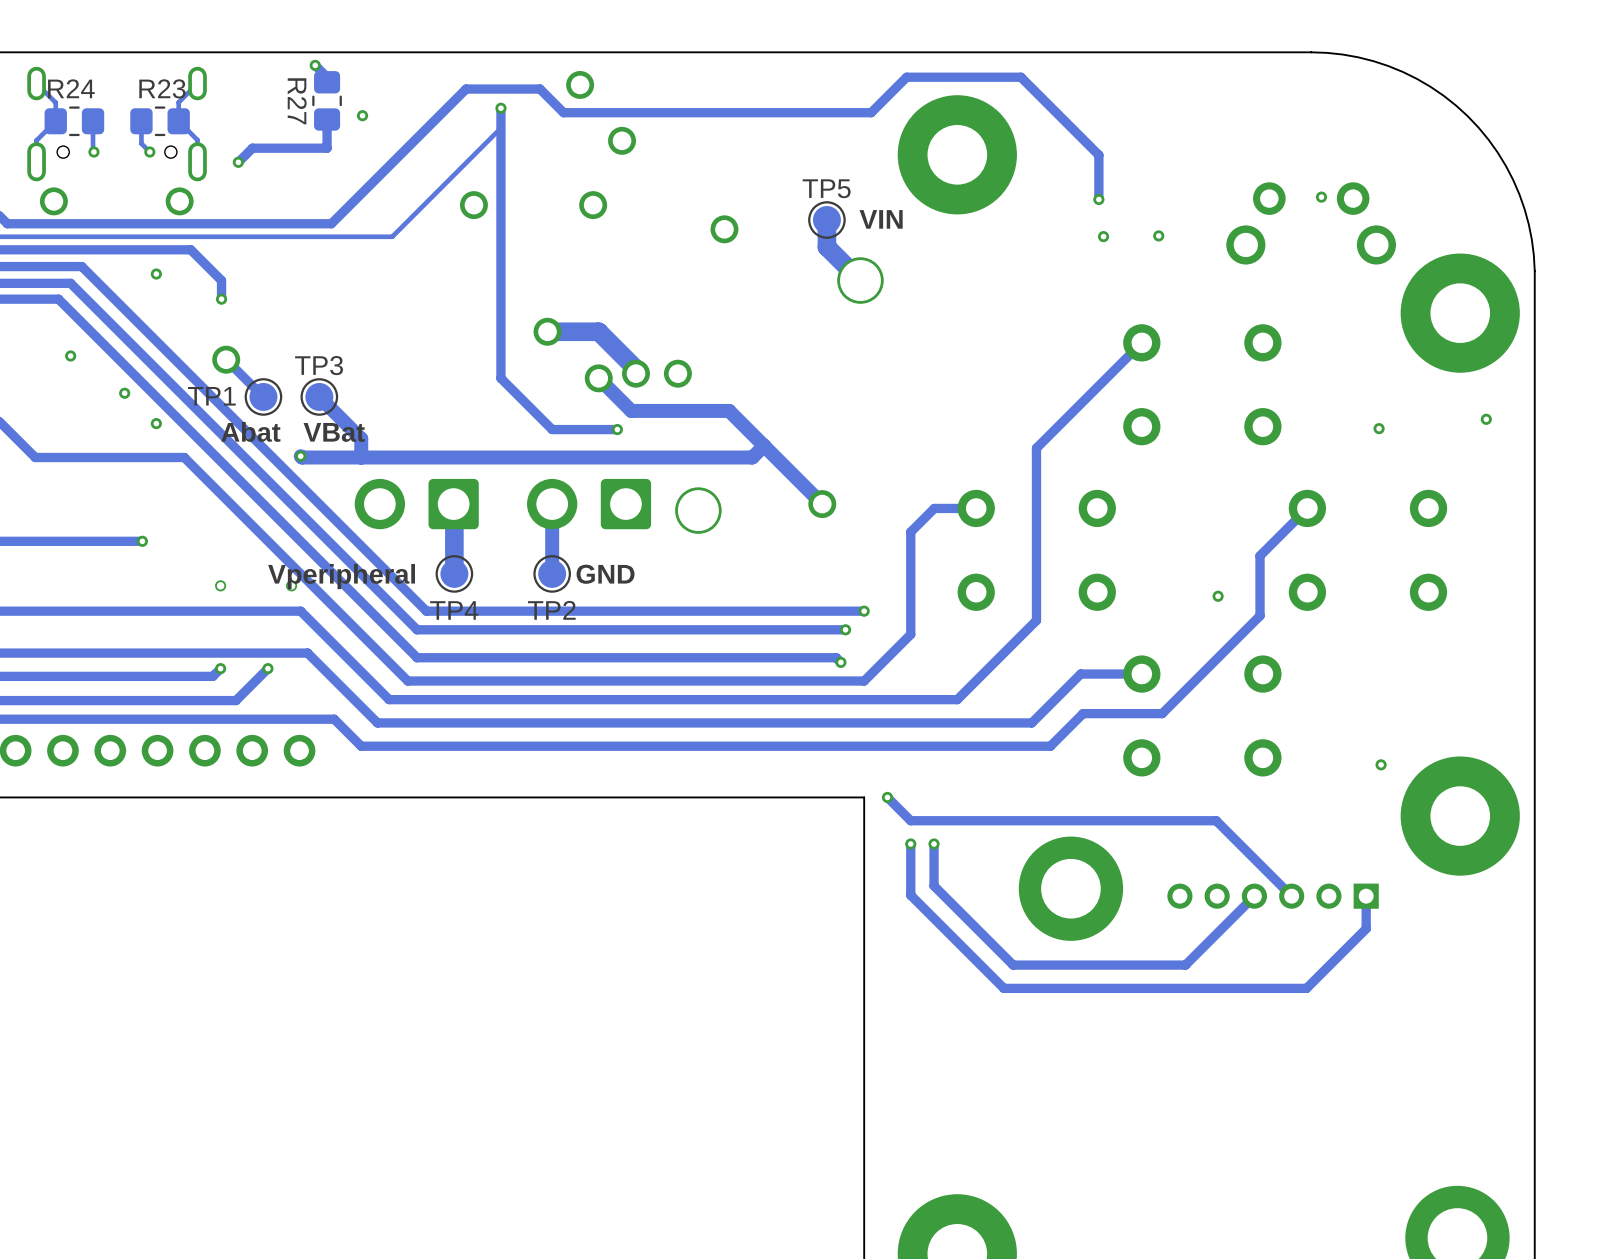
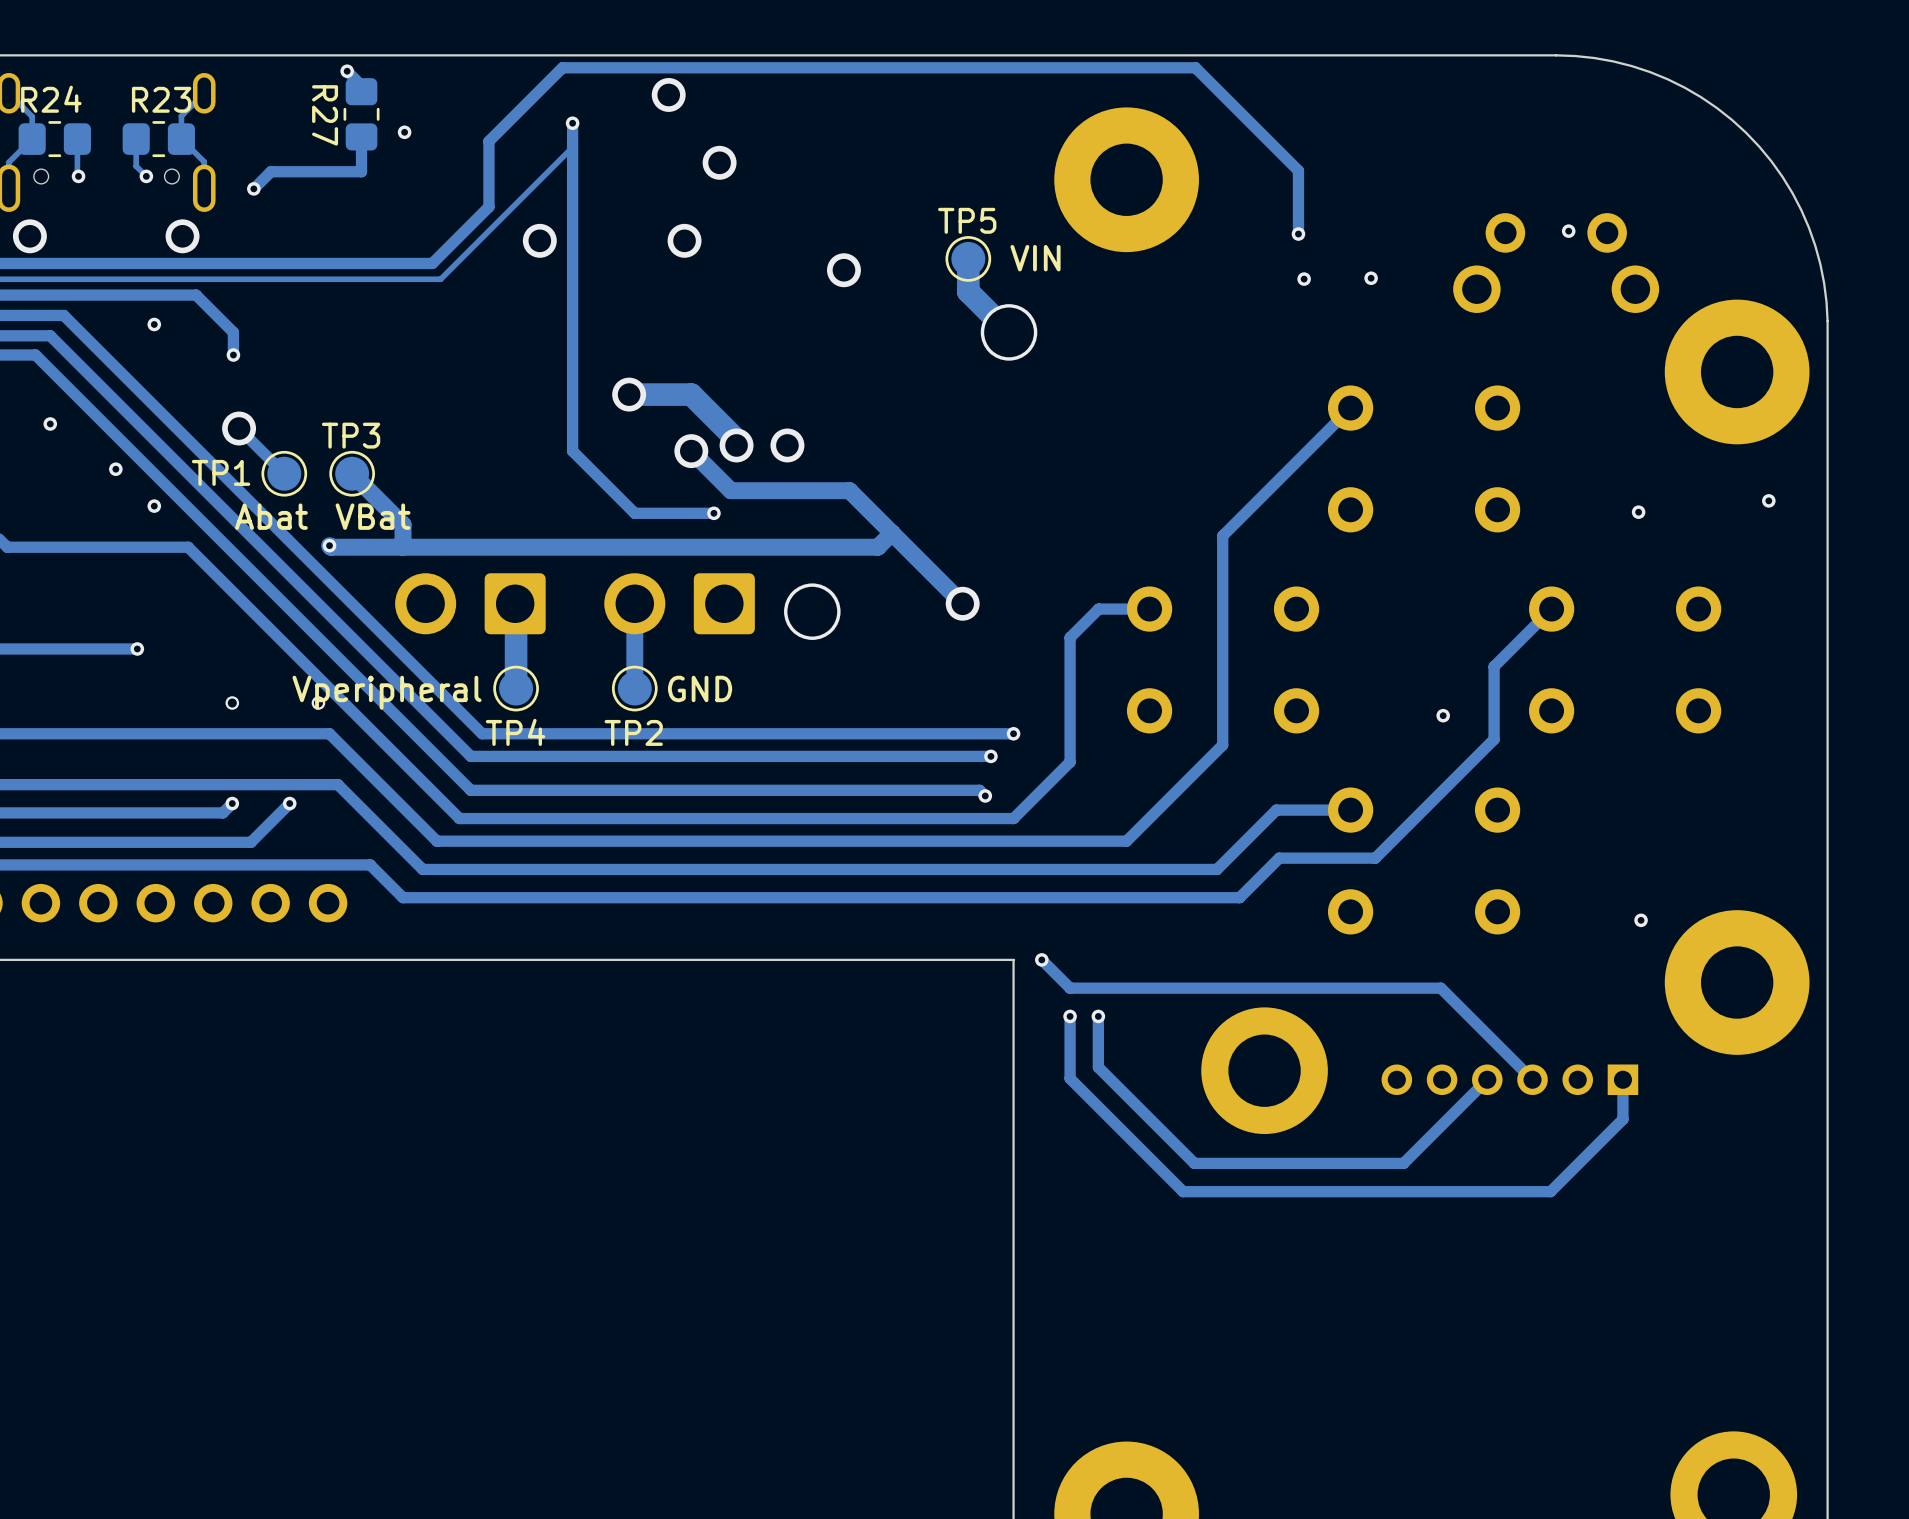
track: (466, 89) (539, 89) (563, 112) (871, 112) (906, 77) (1020, 77) (1098, 155) -> (530, 99) (562, 67) (1195, 67) (1298, 170) (1298, 180)
track: (432, 123) (331, 223) -> (488, 141) (488, 206) (432, 263) (366, 263)

